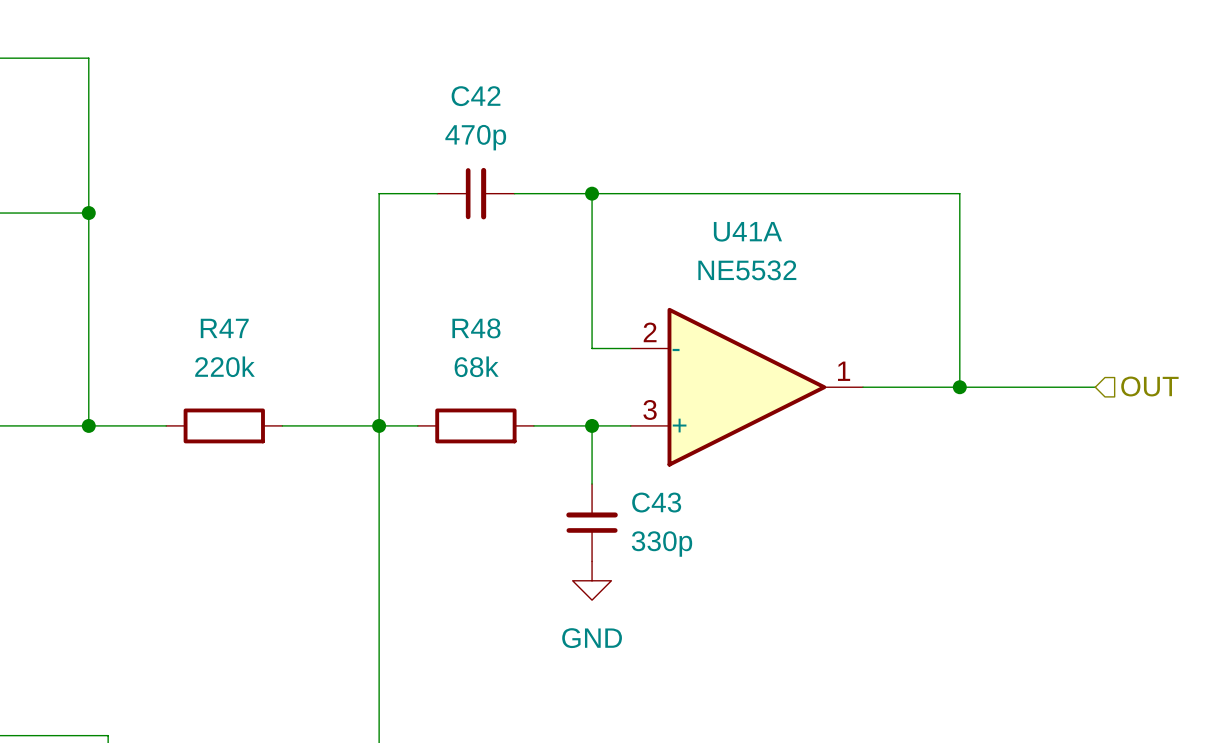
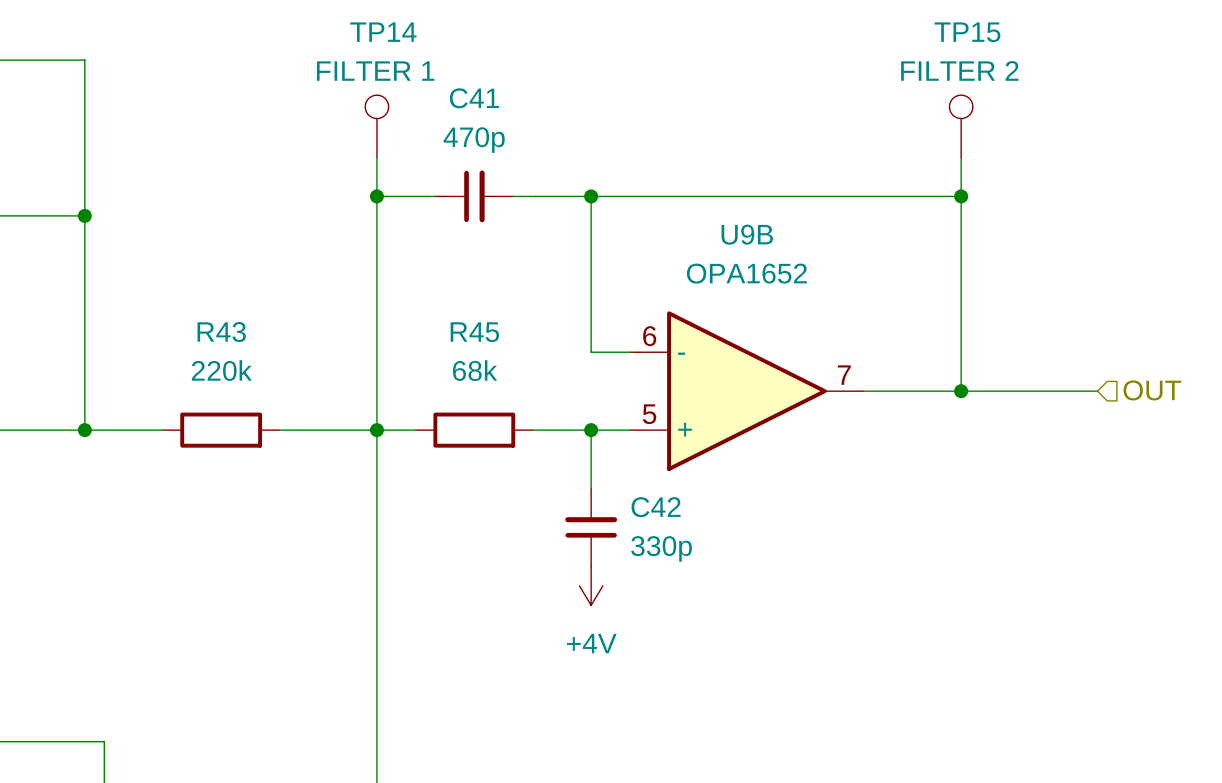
C42 name: C42 (476, 96) -> C41 (474, 98)
TP14: none -> FILTER 1 (376, 126)
TP15: none -> FILTER 2 (961, 126)
wire: none -> (376, 157) (376, 196)
wire: none -> (961, 157) (961, 196)
junction: none -> (376, 196)
junction: none -> (961, 196)
R47 name: R47 (224, 328) -> R43 (221, 332)
R48 name: R48 (476, 328) -> R45 (474, 332)
U41A: NE5532 (746, 387) -> none
U9B: none -> OPA1652 (746, 391)
C43 name: C43 (656, 502) -> C42 (656, 507)
power symbol: GND (592, 580) -> +4V (591, 585)

